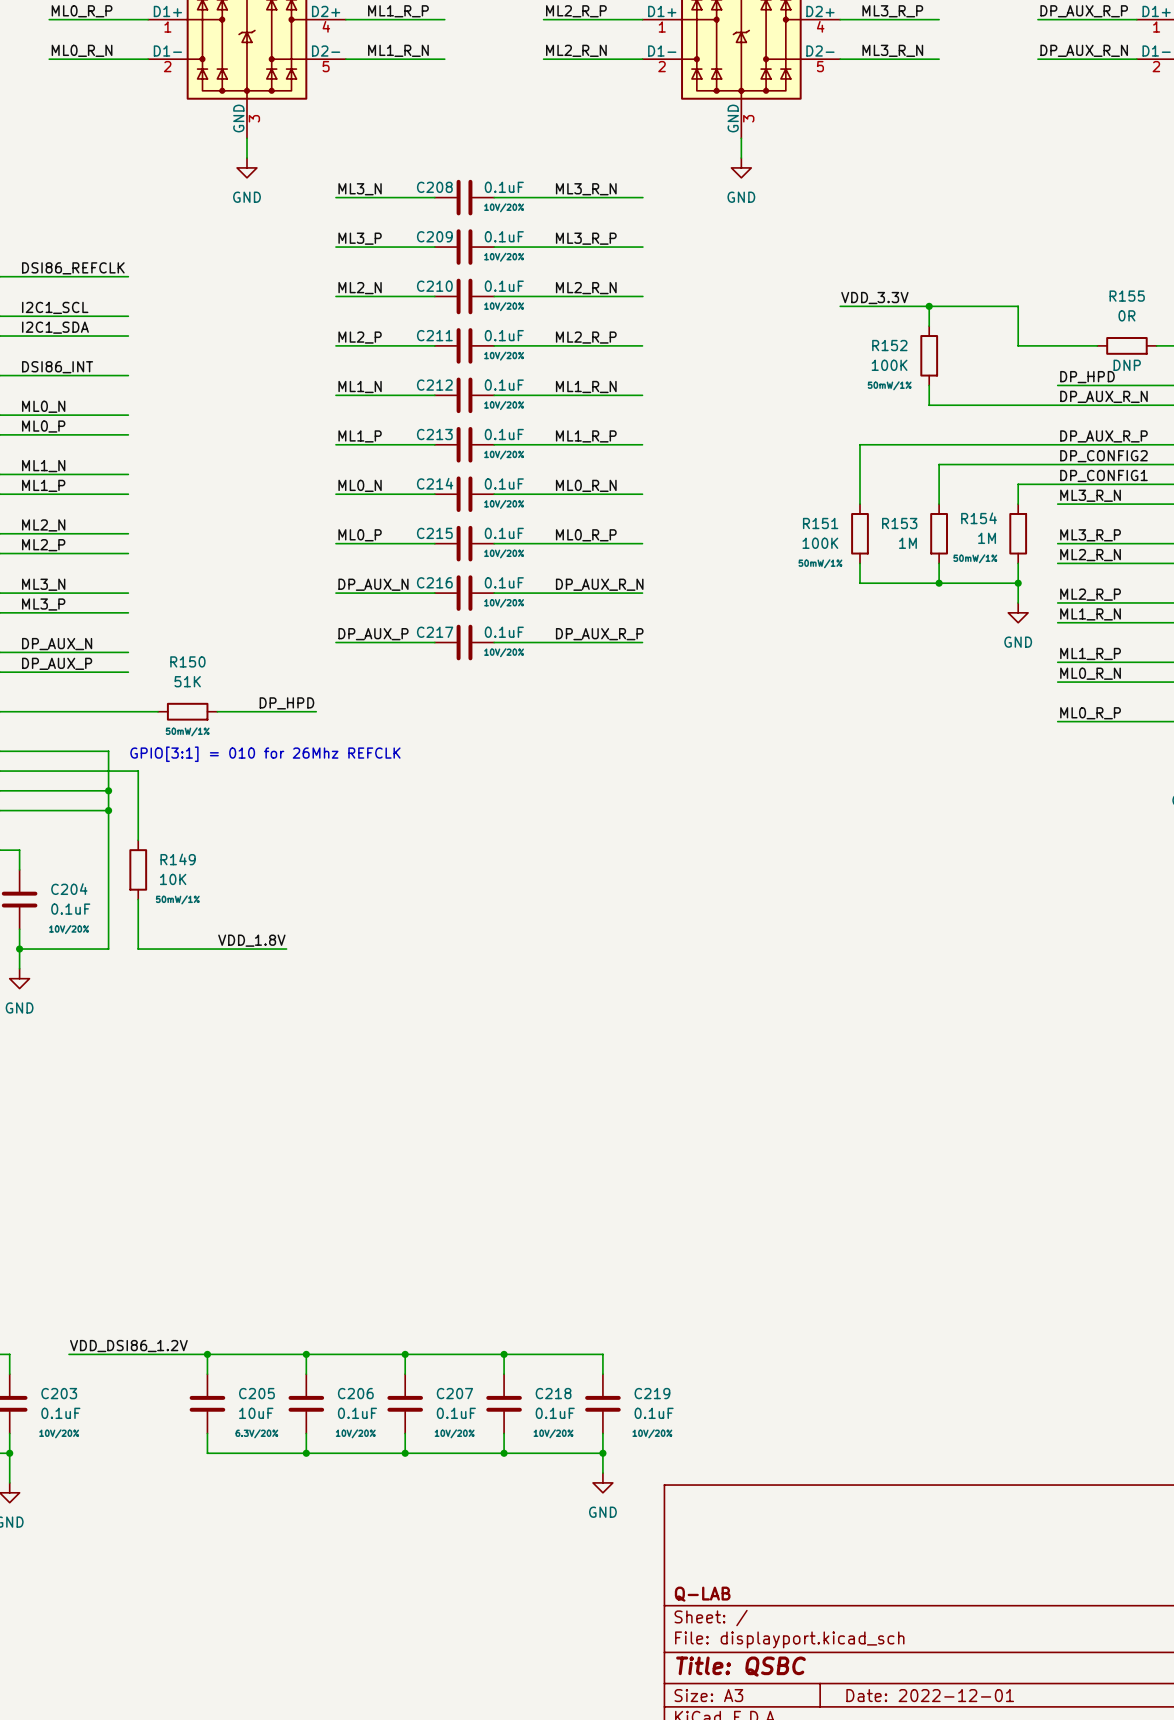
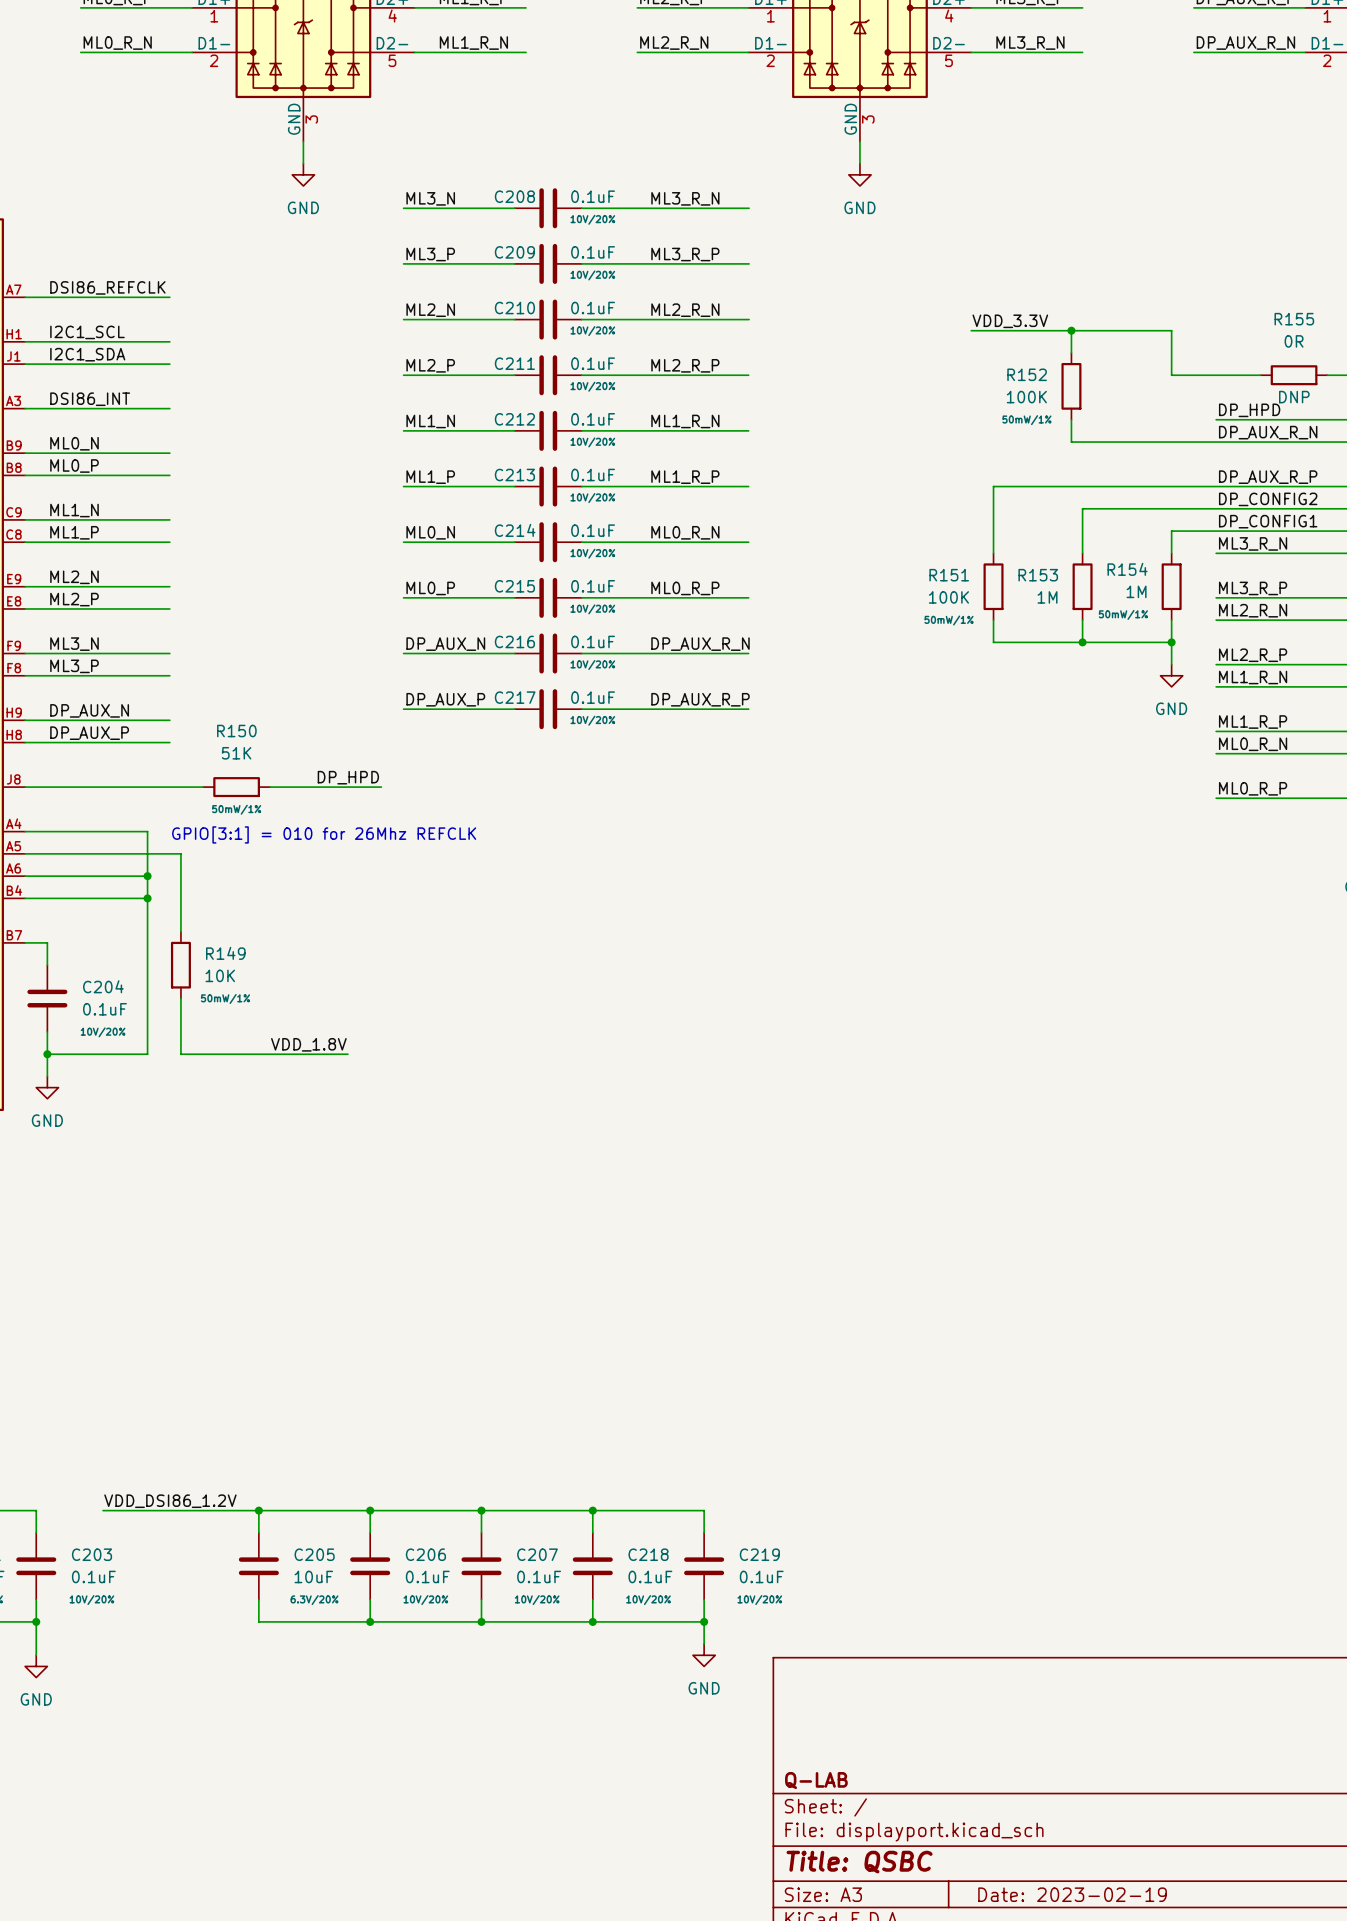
title block: Date: 2022-12-01 (930, 1695) -> Date: 2023-02-19 (1072, 1894)

